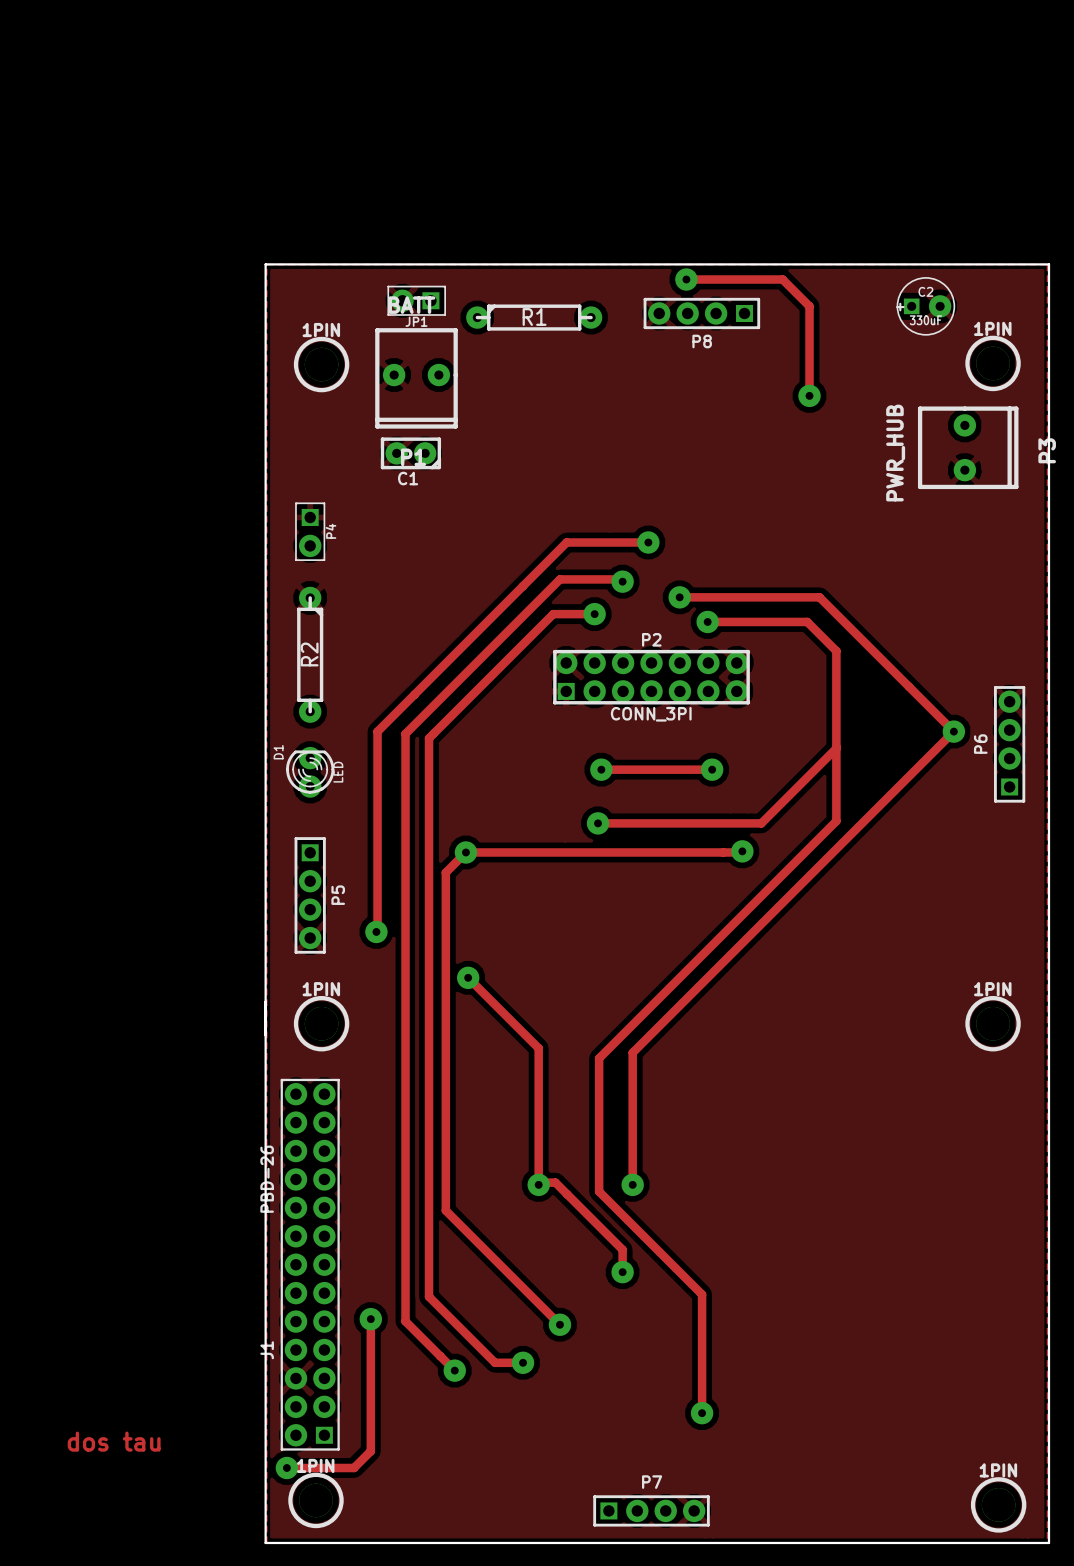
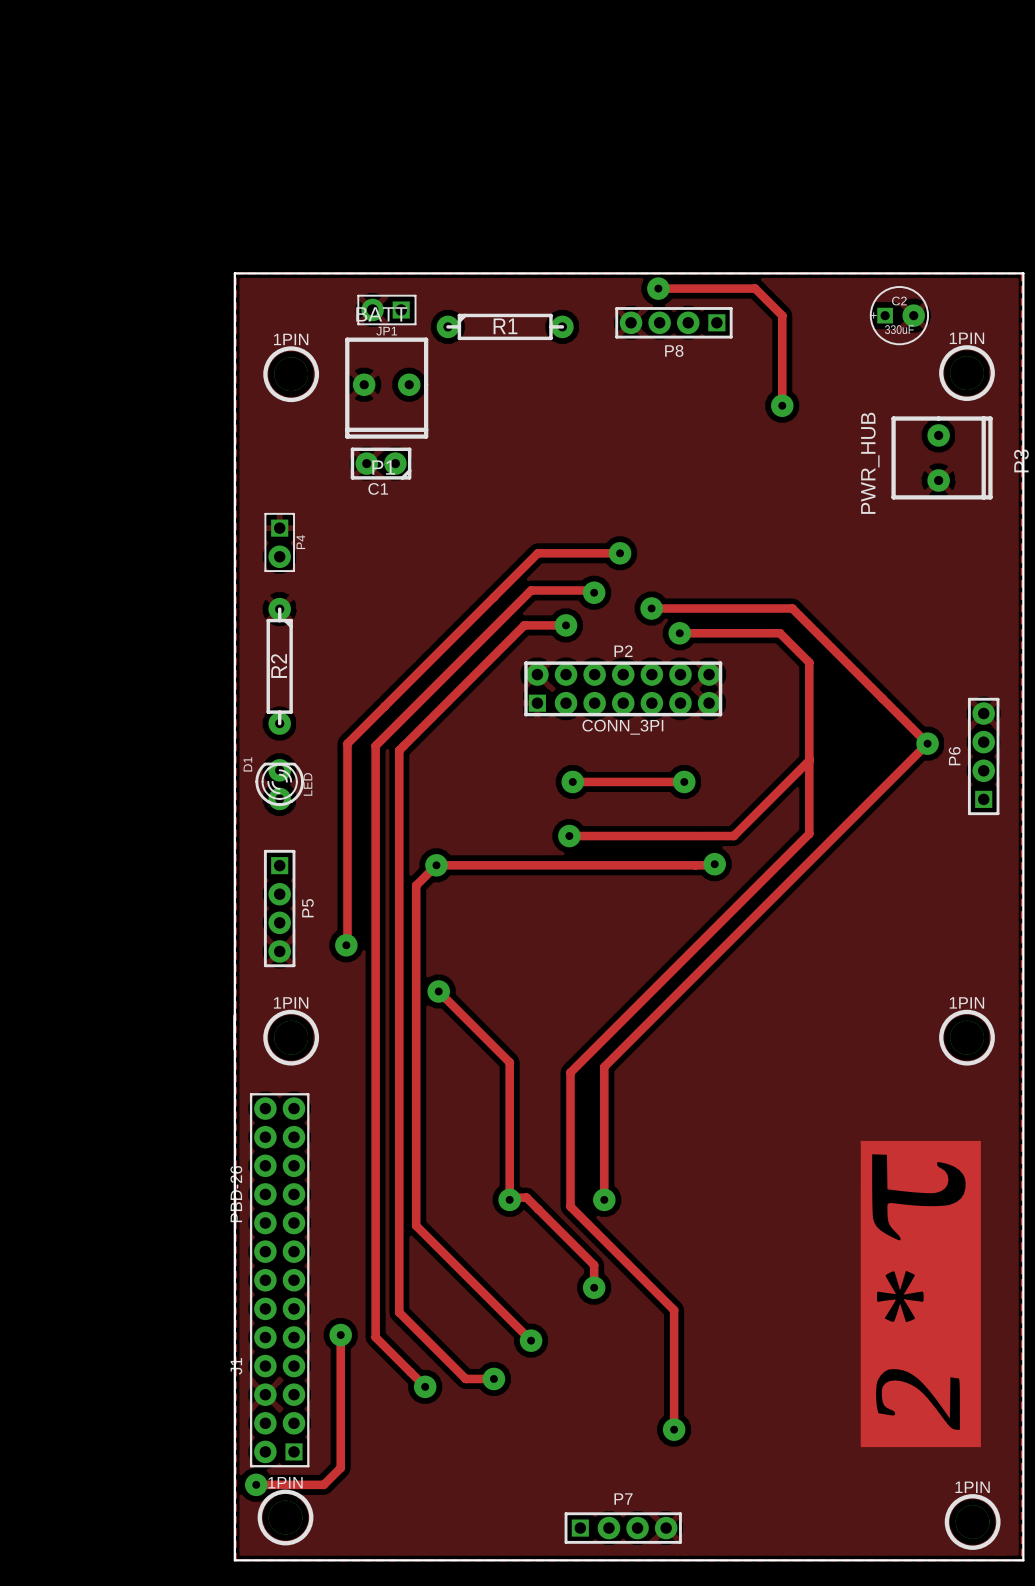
drawing: none -> [860, 1140, 981, 1448]
text: dos tau (114, 1441) -> none

